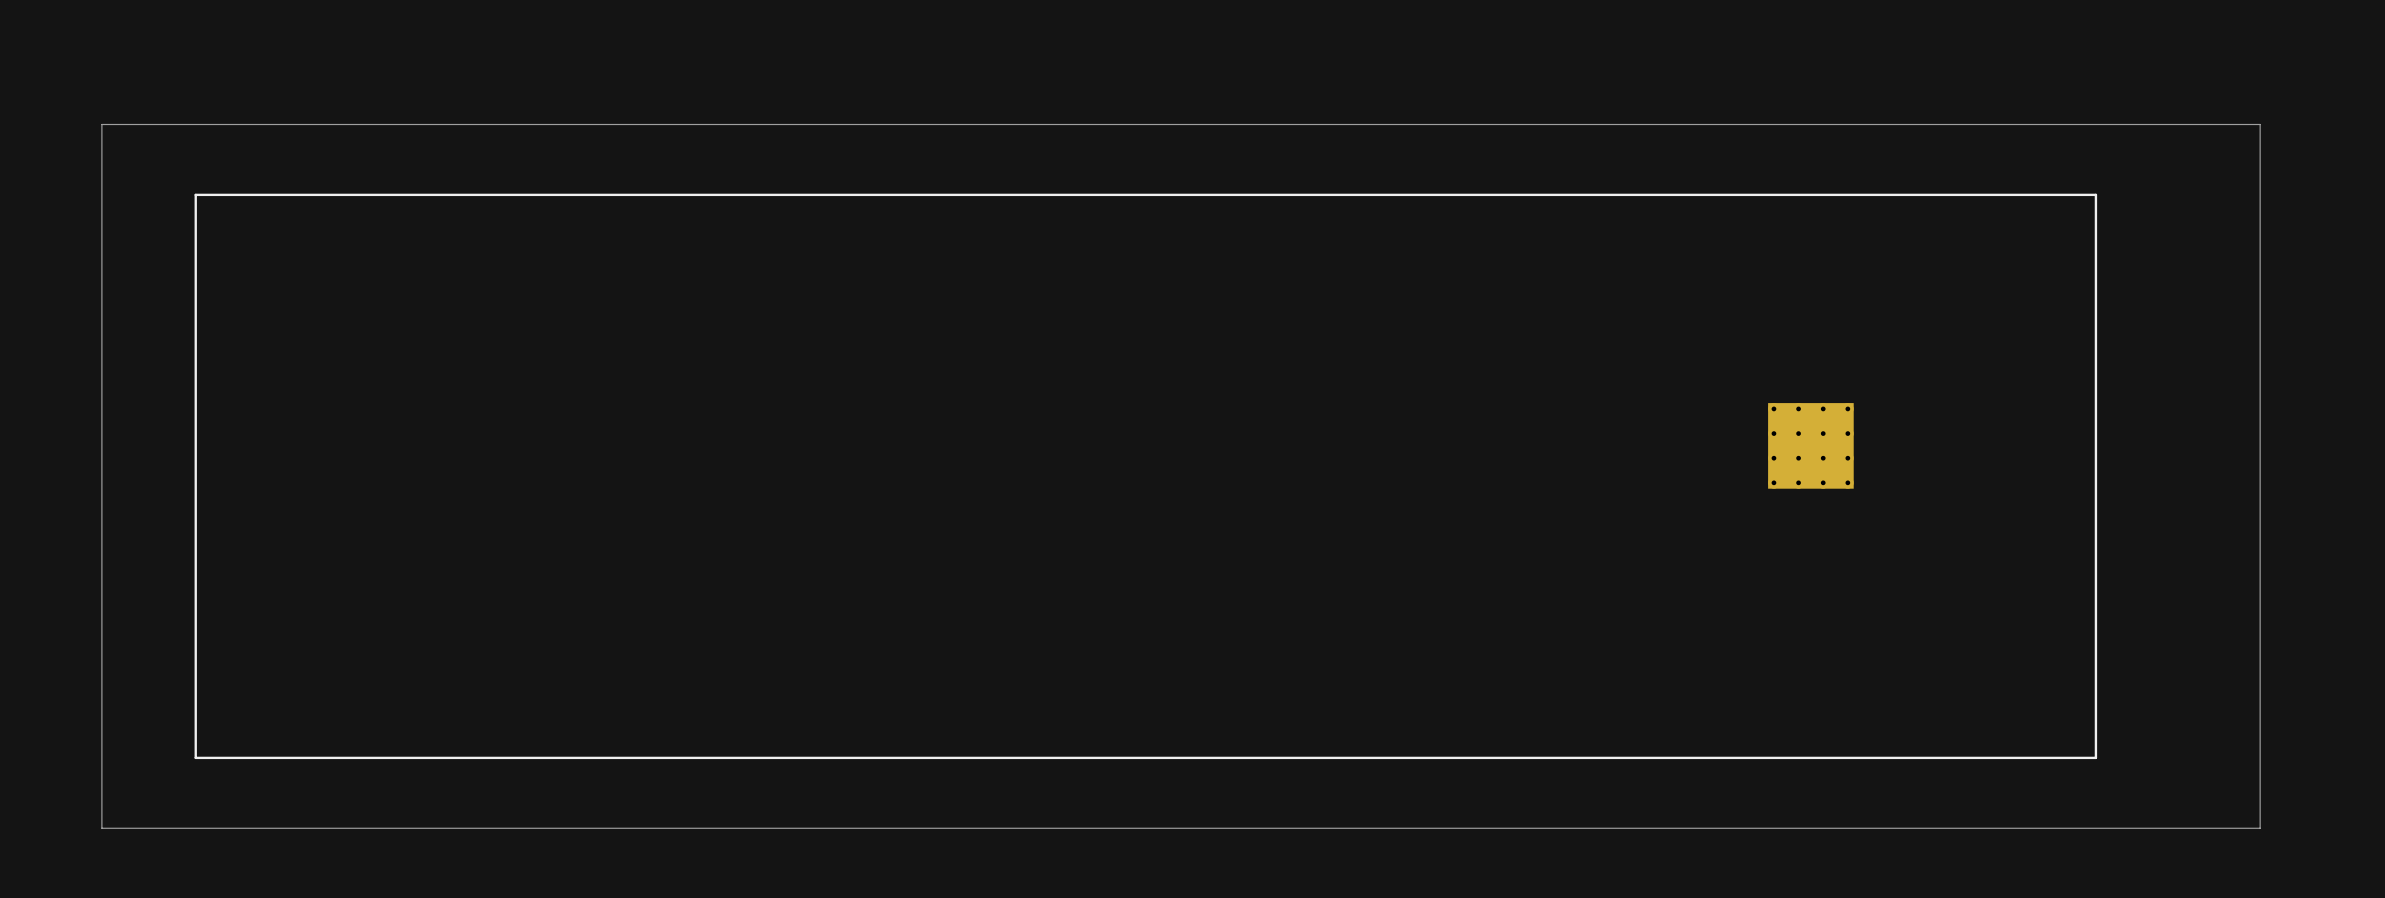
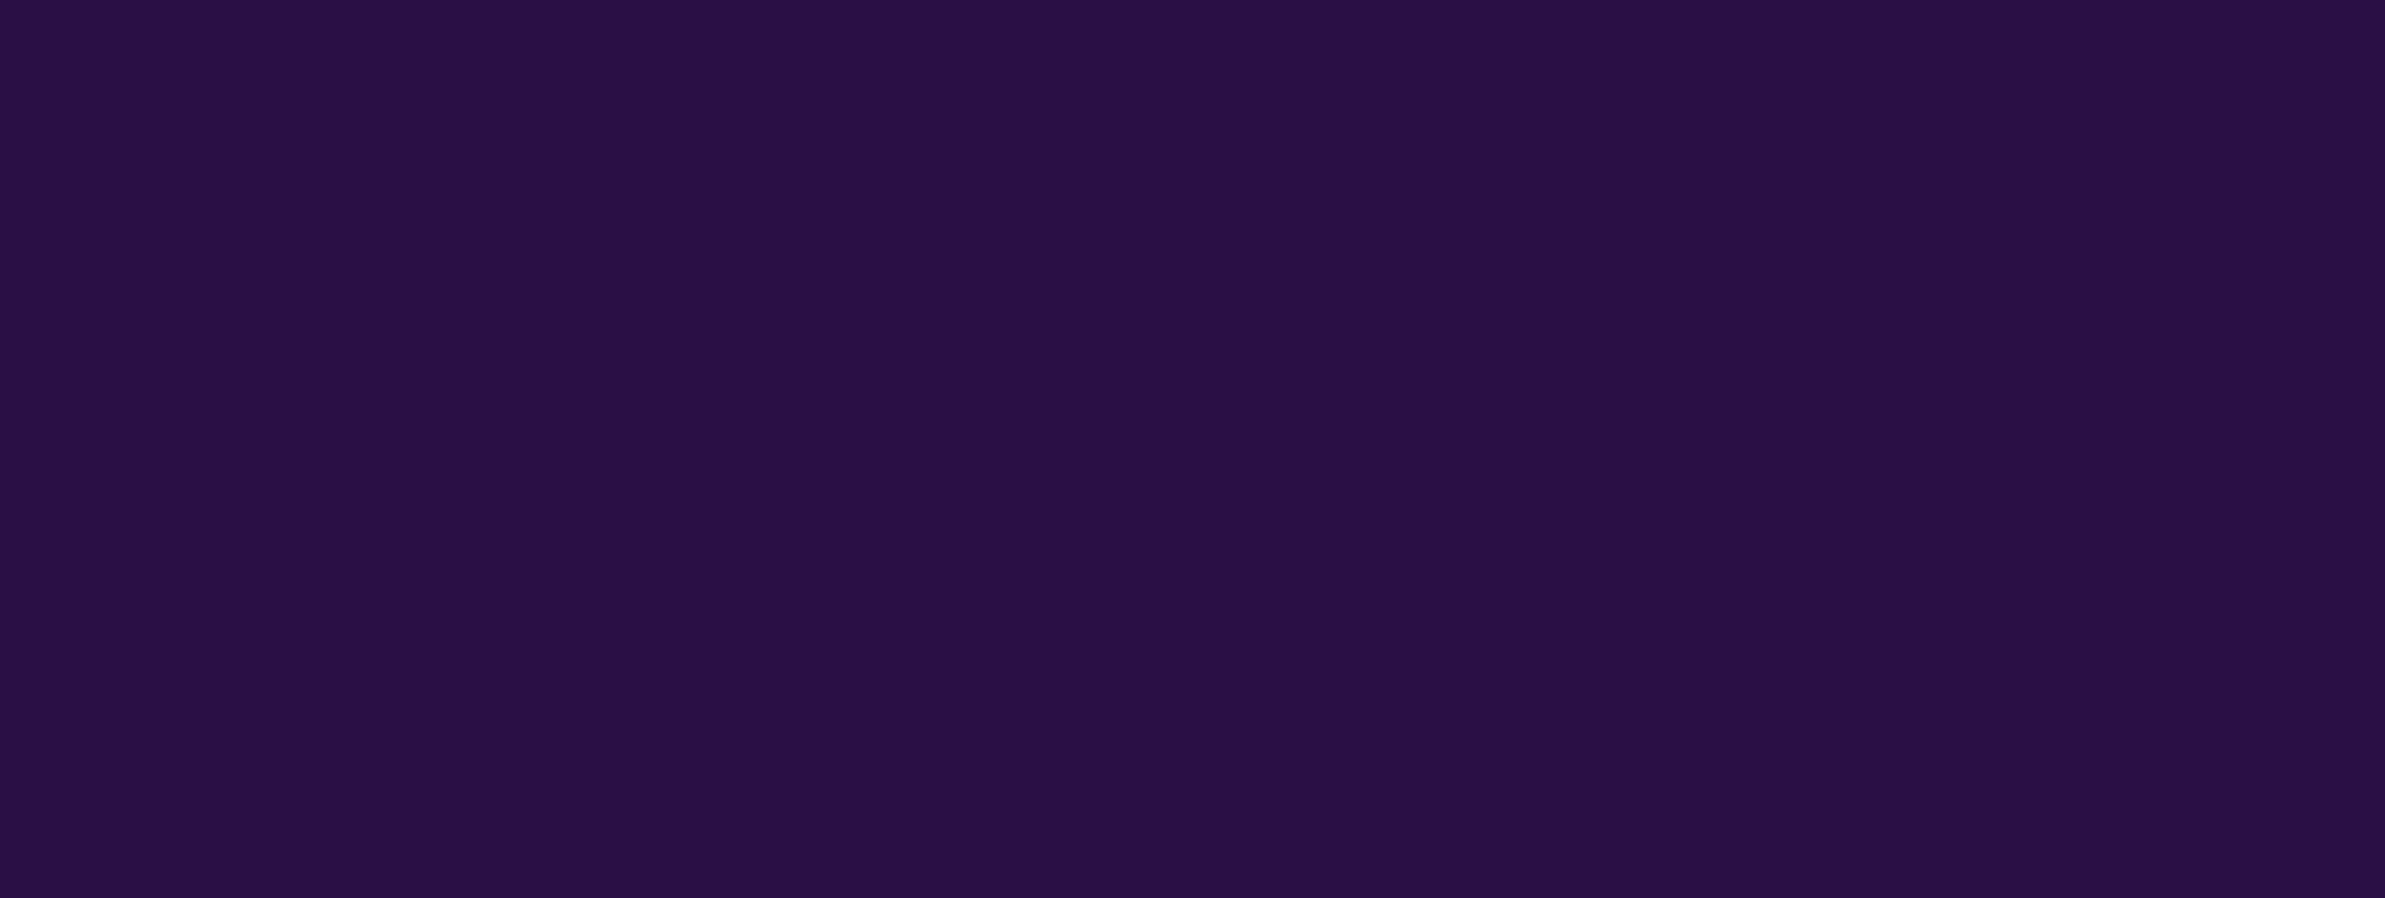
board edge: (2260, 124) (101, 124) (101, 828) (2260, 828) (2260, 124) -> none
line: (2095, 194) (195, 194) (195, 757) (2095, 757) (2095, 194) -> none
part: (1810, 445) -> none

